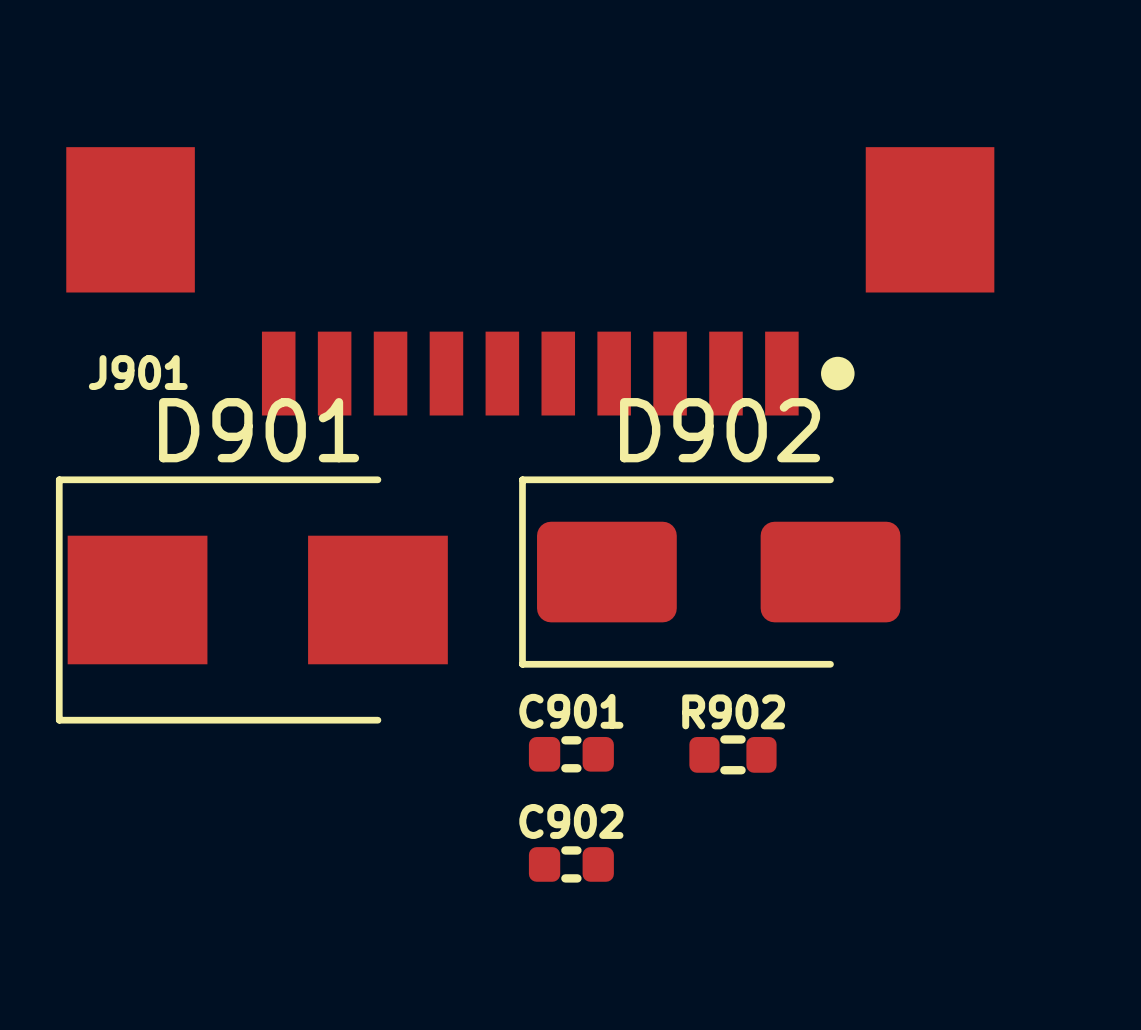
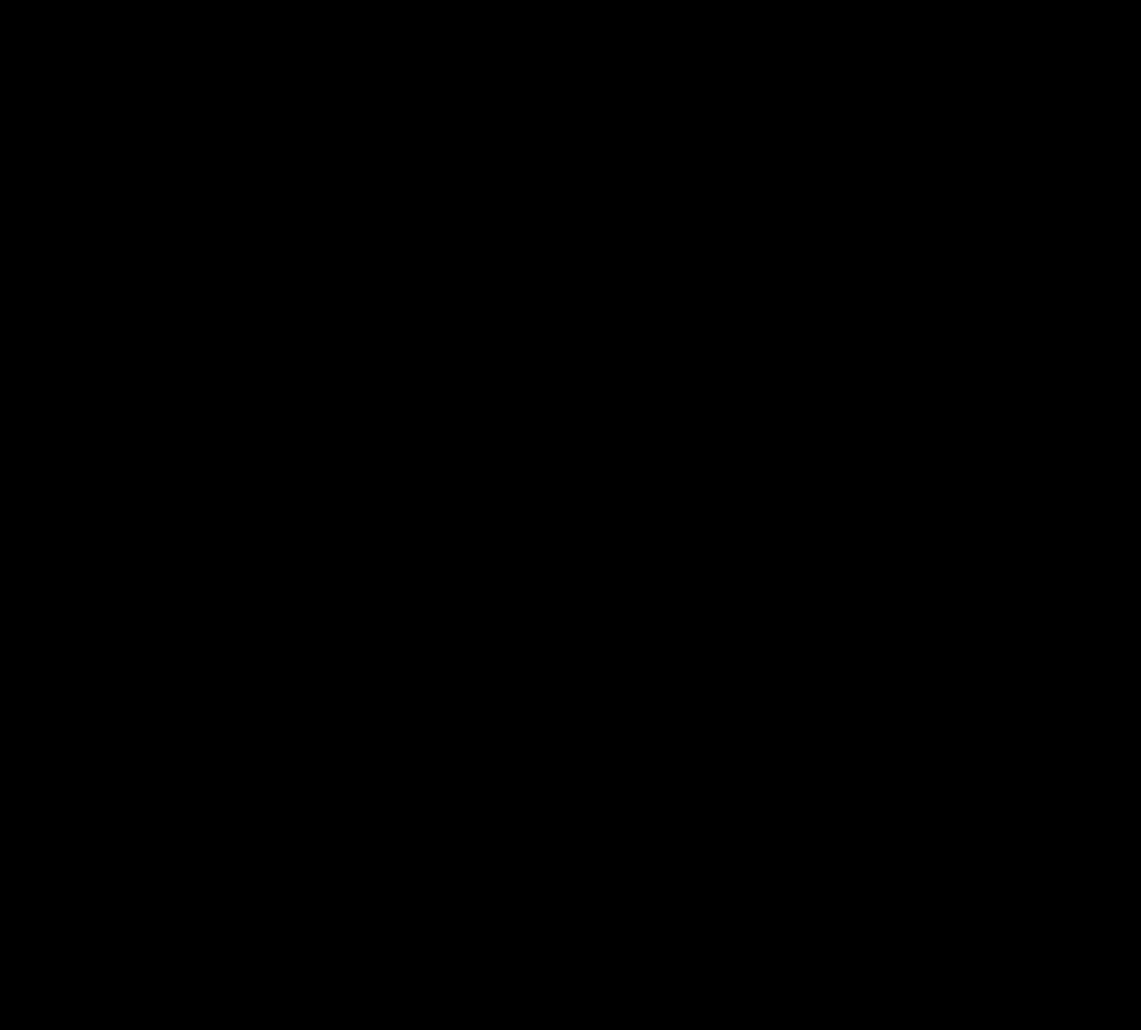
J901: (530, 281) -> none
D902: (709, 572) -> none
D901: (251, 599) -> none
C901: (571, 754) -> none
R902: (732, 754) -> none
C902: (571, 864) -> none

